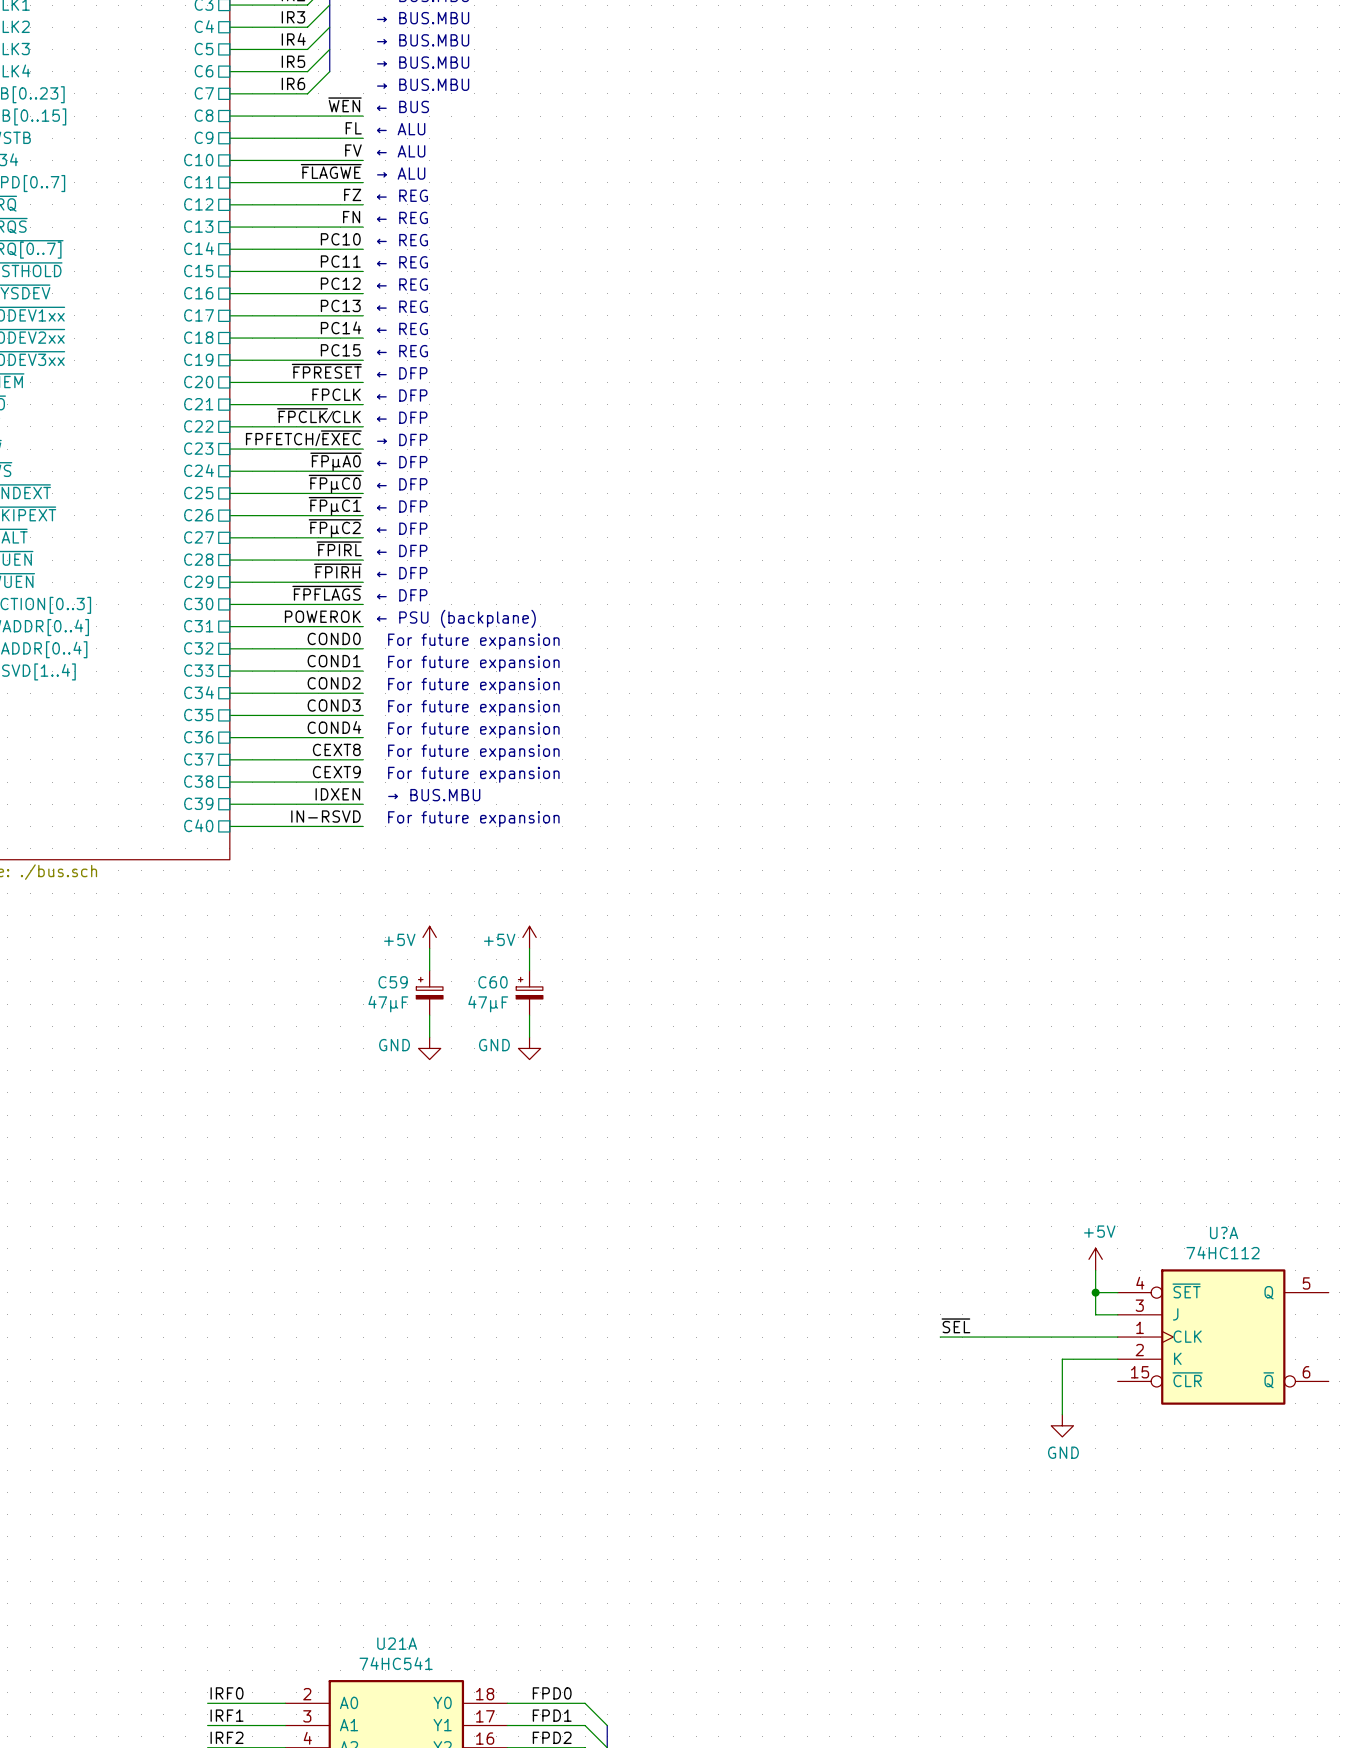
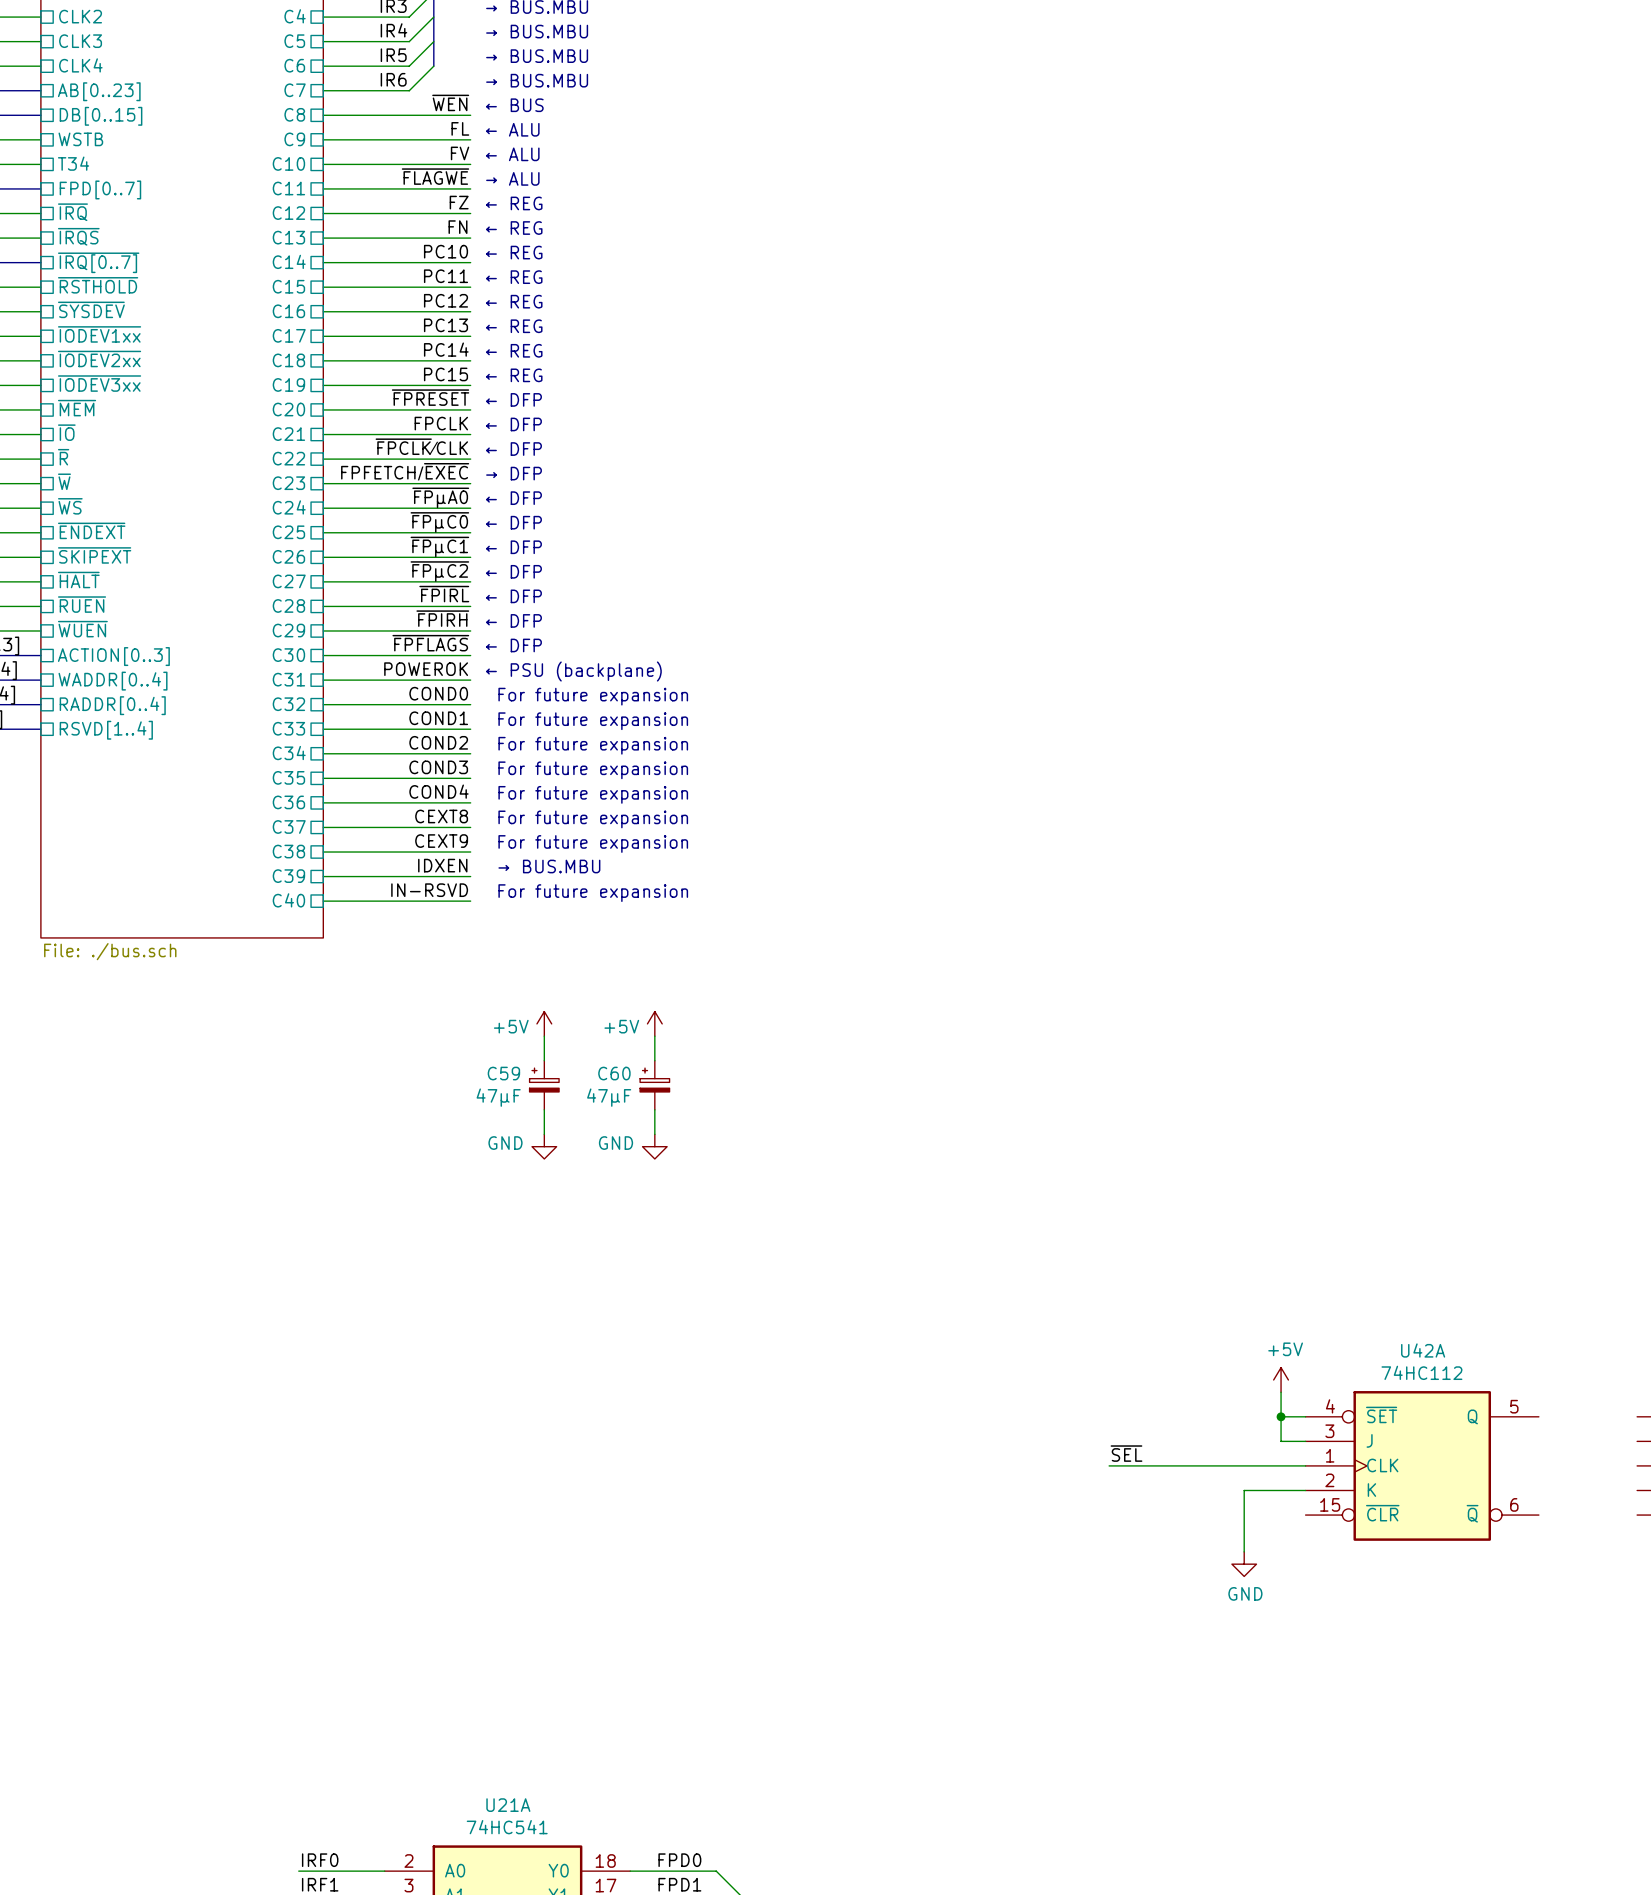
U?A name: U?A (1224, 1232) -> U42A (1423, 1350)

